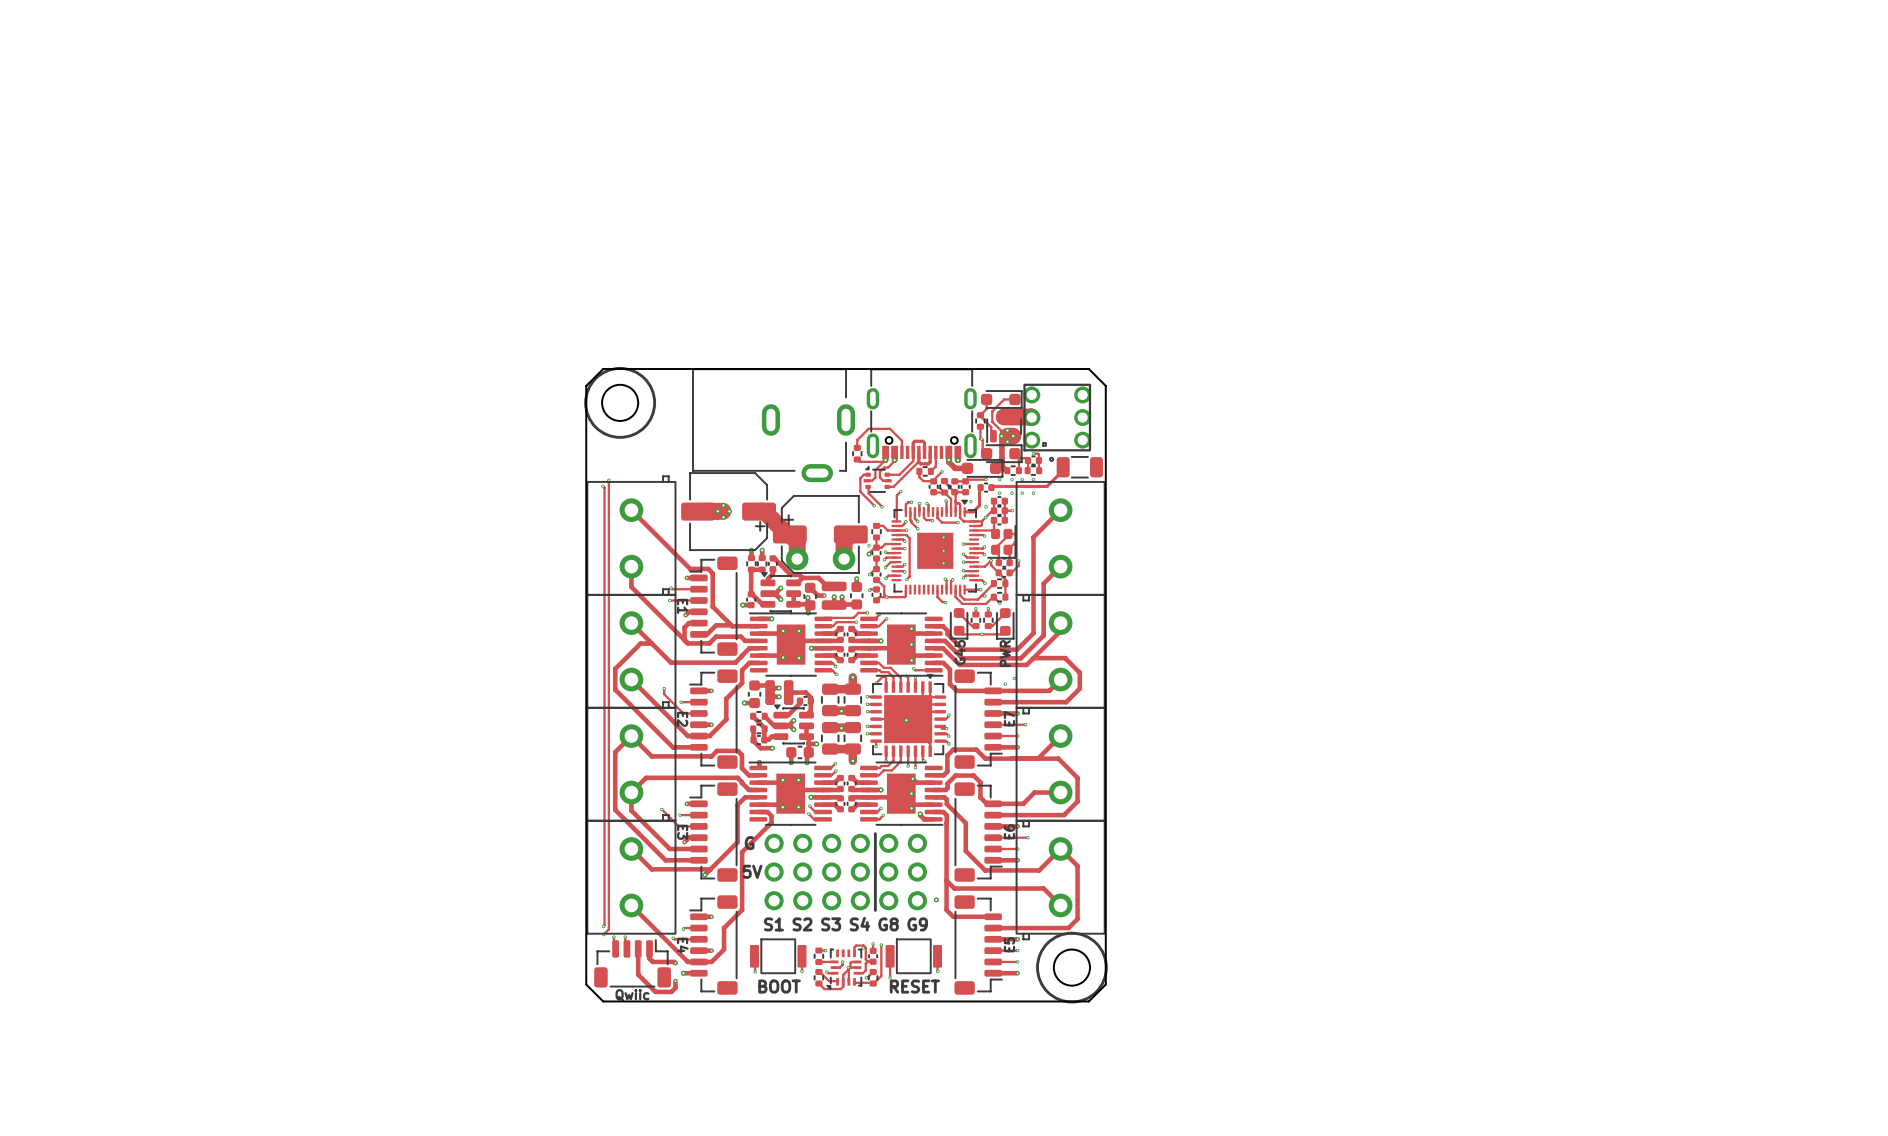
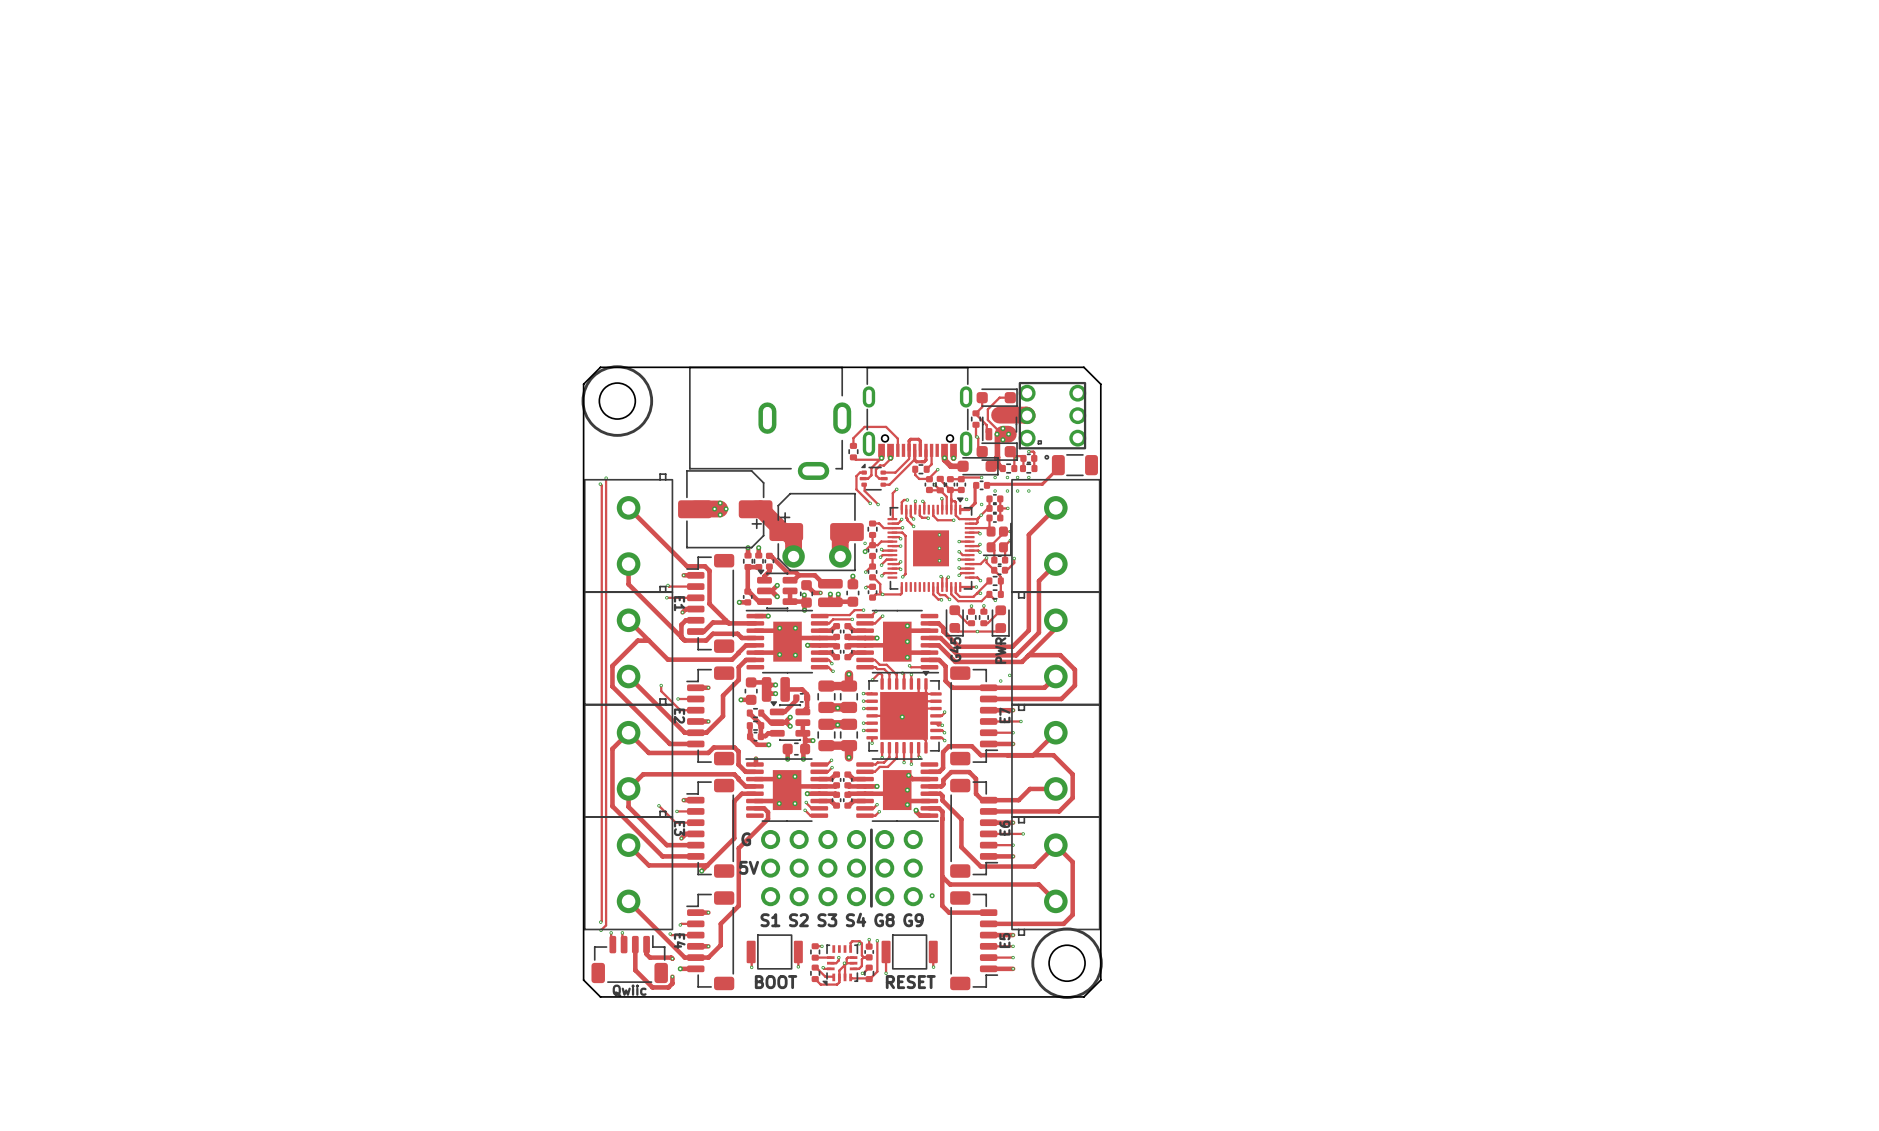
track: none -> (937, 586) (937, 592) (940, 595) (945, 595) (949, 599)
via: none -> (949, 599)

